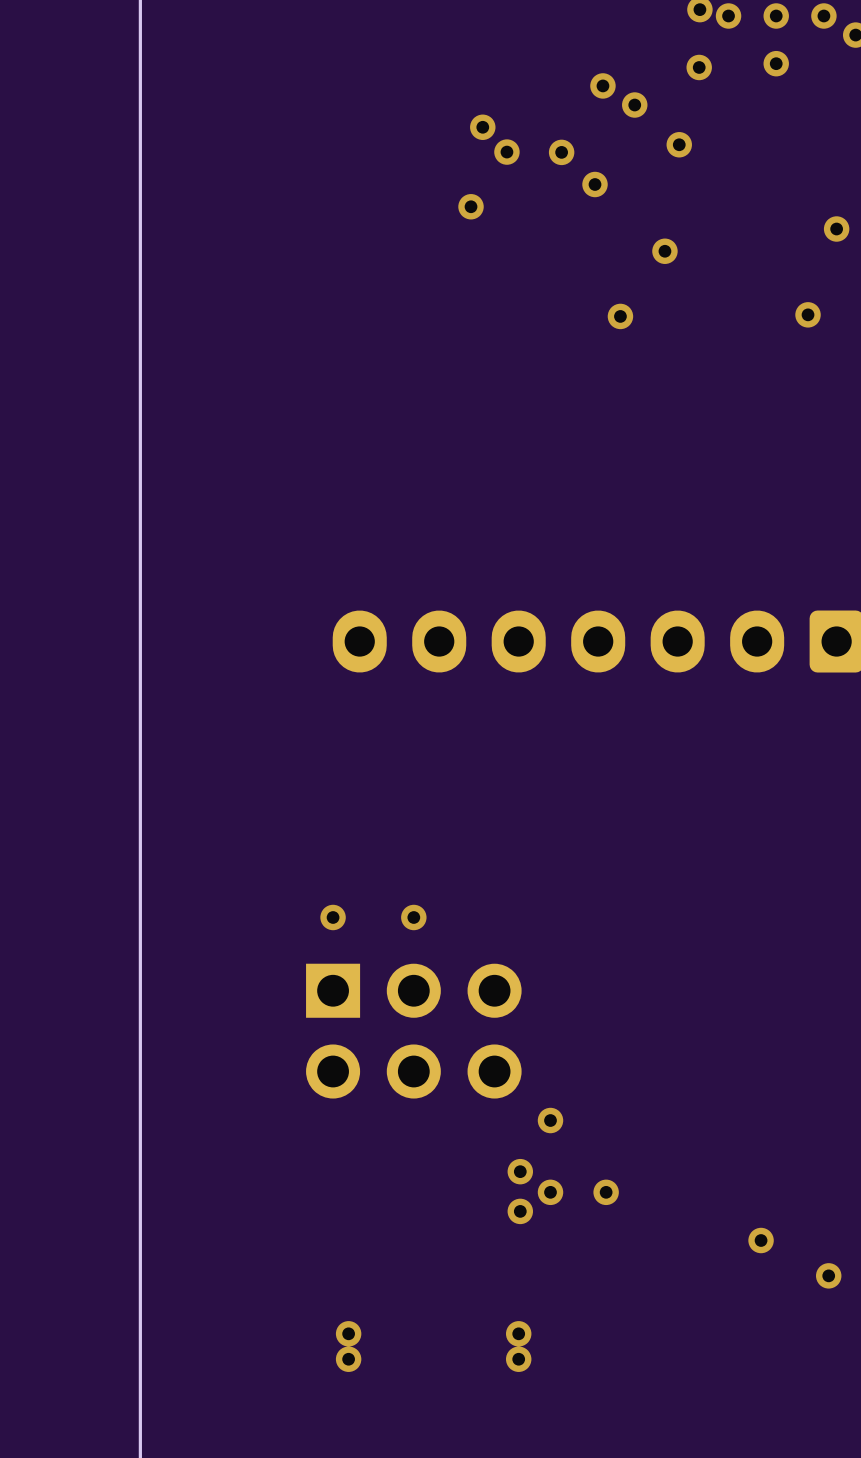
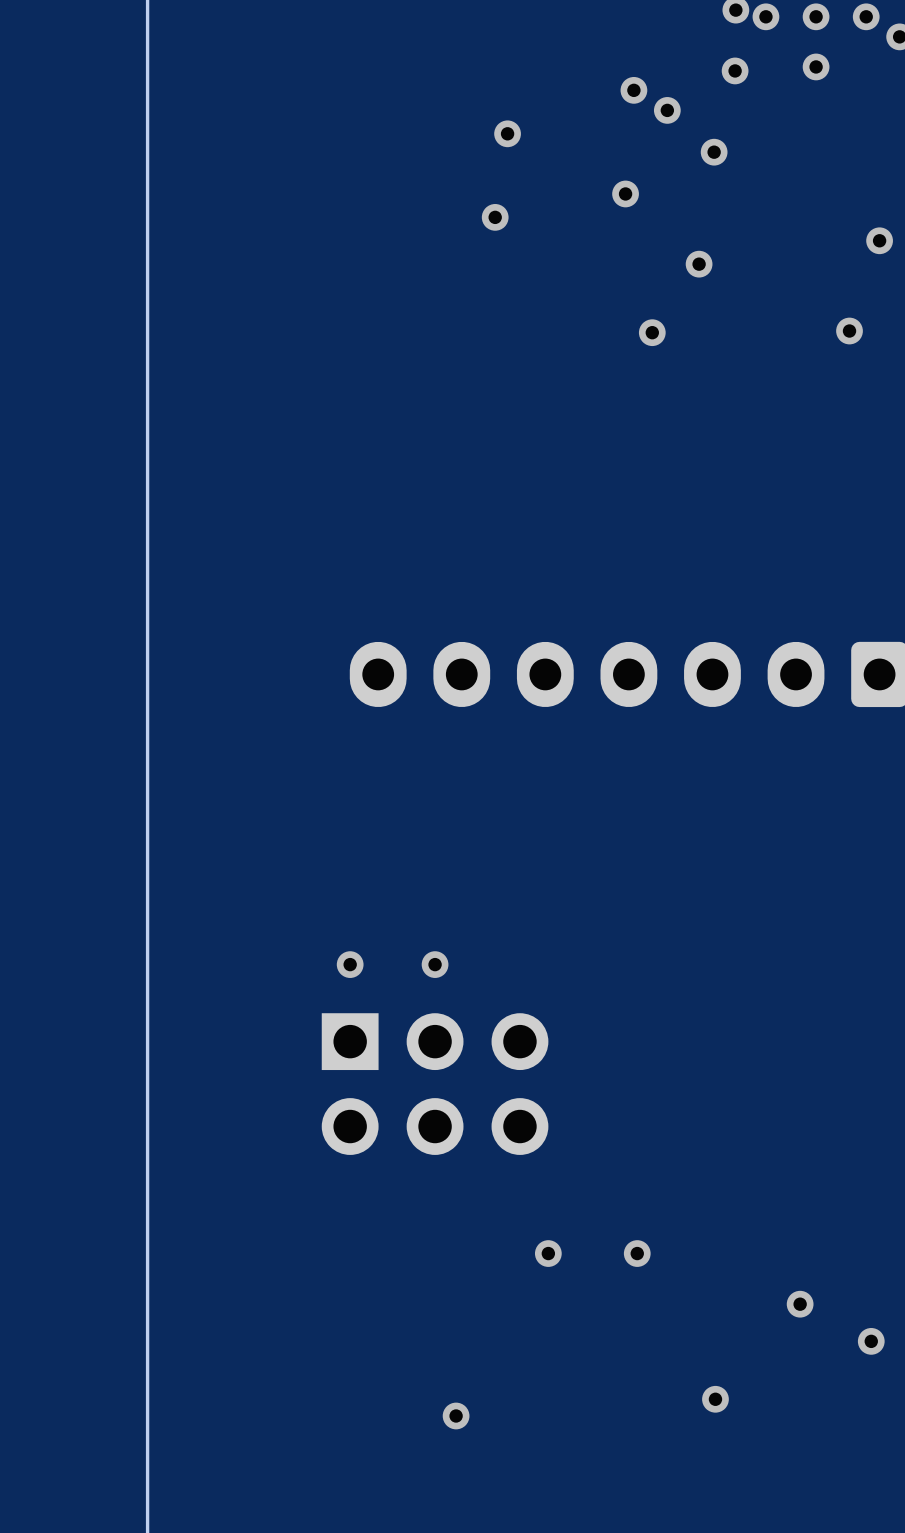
via: (506, 152) -> none
via: (561, 152) -> none
via: (550, 1120) -> none
via: (520, 1171) -> none
via: none -> (548, 1253)
via: (550, 1192) -> none
via: (520, 1211) -> none
via: none -> (715, 1399)
via: (348, 1333) -> none
via: (518, 1333) -> none
via: none -> (456, 1415)
via: (348, 1359) -> none
via: (518, 1359) -> none

